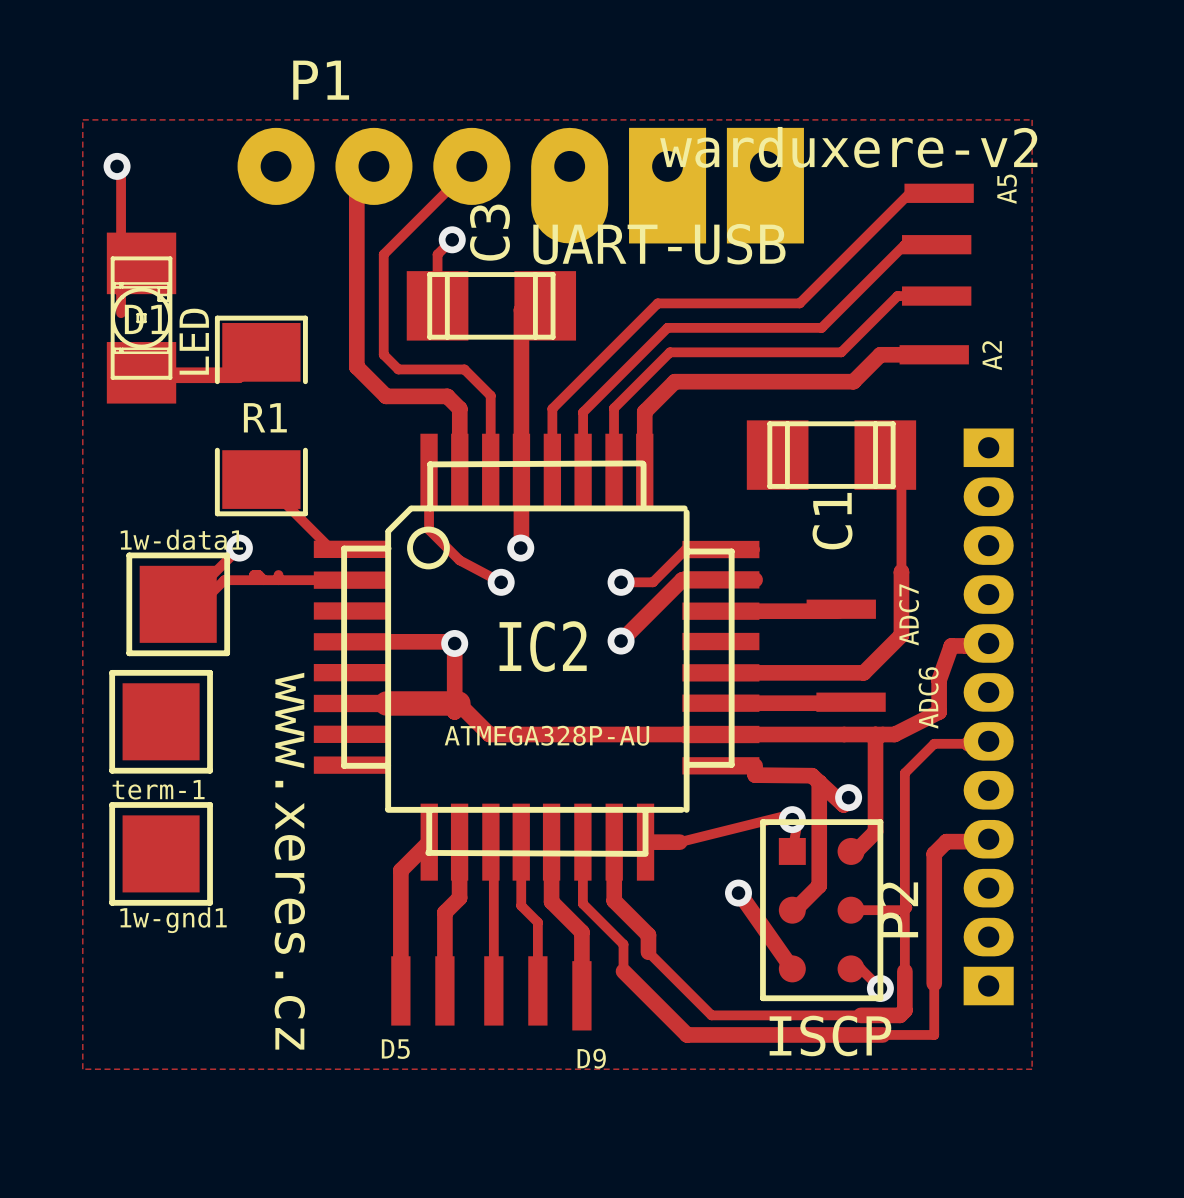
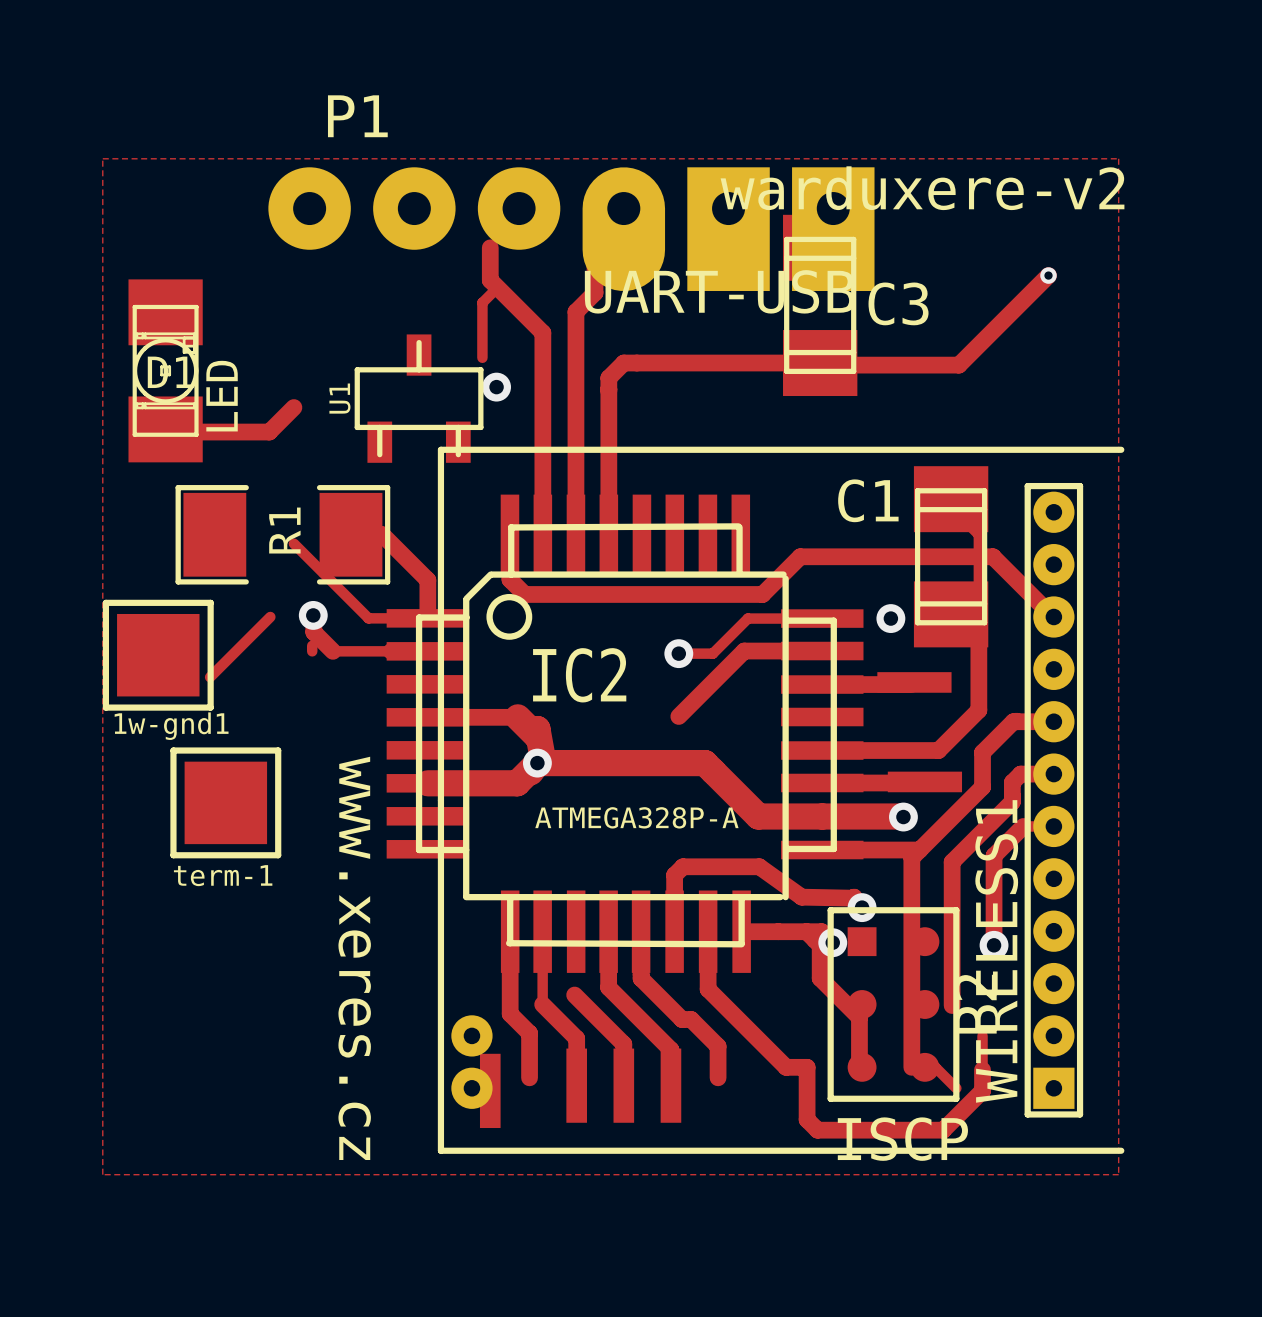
track: (117, 166) (121, 170) (121, 313) -> none
via: (117, 166) -> none
track: (373, 166) (356, 183) (356, 367) (386, 396) (447, 396) (459, 408) (459, 472) -> none
track: (471, 166) (383, 254) (383, 354) (398, 369) (464, 369) (490, 395) (490, 472) -> none
track: (939, 193) (909, 193) (799, 303) (657, 303) (552, 408) (552, 472) -> none
A5: (939, 193) -> none
track: none -> (490, 247) (490, 280) (542, 332) (542, 535)
track: none -> (595, 247) (595, 292) (575, 311) (575, 535)
track: none -> (1048, 275) (958, 365) (623, 363) (608, 377) (608, 535)
via: none -> (1048, 275)
via position: (452, 239) -> (496, 387)
track: (936, 244) (904, 244) (821, 327) (667, 327) (583, 412) (583, 472) -> none
part: (936, 244) -> none
track: (936, 296) (897, 296) (841, 352) (670, 352) (614, 408) (614, 472) -> none
part: (936, 296) -> none
C3 rotation: 0° (491, 305) -> 90° clockwise (820, 305)
C3 position: (491, 305) -> (820, 305)
track: (525, 305) (521, 310) (520, 548) -> none
U1: none -> (419, 398)
track: (934, 354) (880, 354) (853, 381) (674, 381) (644, 411) (644, 472) -> none
A2: (934, 354) -> none
R1 rotation: 0° (261, 415) -> 90° clockwise (282, 534)
C1 rotation: 0° (831, 455) -> 90° clockwise (951, 556)
track: none -> (350, 534) (382, 534) (427, 580) (427, 618)
track: (429, 472) (429, 529) (459, 560) (501, 582) -> none
track: none -> (509, 535) (509, 579) (524, 594) (762, 594) (800, 556) (992, 556) (1053, 616)
via position: (239, 548) -> (313, 615)
via: (520, 548) -> none
via: none -> (890, 618)
track: (254, 574) (258, 574) (263, 580) (254, 574) -> none
track: (297, 580) (224, 580) (200, 604) (178, 604) -> (332, 651) (313, 632) (313, 615)
via: (501, 582) -> none
1w-data1: (178, 604) -> none
ADC7 name: ADC7 (909, 614) -> none
track: (453, 641) (454, 643) (454, 712) -> (498, 717) (517, 717) (537, 736) (537, 729) (542, 757) (517, 783) (504, 783)
via: (621, 641) -> none
via: (454, 643) -> none
track: (951, 645) (939, 680) (939, 712) (894, 734) (830, 734) -> (1032, 721) (1013, 721) (982, 752) (982, 787) (911, 857) (911, 1067)
IC2 name position: IC2 (543, 646) -> IC2 (579, 675)
IC2 position: (536, 657) -> (625, 733)
via: none -> (537, 763)
track: none -> (1053, 774) (1020, 774) (1012, 782) (1012, 801) (952, 862) (952, 1005)
ADC6 name: ADC6 (928, 697) -> none
track: (458, 703) (489, 734) (695, 734) -> (530, 772) (537, 763) (704, 763) (758, 816)
part: (988, 716) -> none
WIRELESS1: none -> (781, 800)
term-1 position: (161, 721) -> (225, 802)
track width: thin (695, 734) (830, 734) -> thick (758, 816) (902, 816)
via: none -> (903, 817)
track: (875, 734) (875, 831) (855, 851) (851, 851) -> none
IC2 value: ATMEGA328P-AU (546, 735) -> ATMEGA328P-A (636, 817)
track: (943, 743) (934, 743) (904, 773) (904, 939) -> (1023, 826) (994, 855) (995, 944)
track: (755, 765) (755, 775) (812, 775) (843, 804) (848, 797) -> (822, 850) (919, 850)
track: (819, 782) (819, 885) (794, 910) (792, 910) -> none
via: (848, 797) -> none
track: none -> (854, 897) (801, 897) (759, 866) (682, 866) (674, 875) (674, 931)
track: (971, 841) (946, 841) (934, 853) (934, 1034) (687, 1034) (623, 971) (623, 944) (582, 903) (582, 842) -> none
track: (429, 842) (400, 870) (400, 990) -> none
track: (459, 842) (459, 897) (444, 912) (444, 990) -> none
track: none -> (510, 931) (510, 1013) (529, 1033) (529, 1077)
track: (521, 842) (521, 905) (537, 922) (537, 990) -> none
track: (551, 842) (551, 901) (581, 932) (581, 995) -> none
track: none -> (608, 931) (608, 987) (670, 1049) (670, 1077)
track: none -> (641, 931) (641, 978) (682, 1019) (691, 1019) (718, 1046) (718, 1077)
track: (614, 842) (614, 900) (648, 935) (648, 952) (711, 1015) (899, 1015) (904, 1010) (904, 990) -> (708, 931) (708, 989) (786, 1067) (807, 1067) (807, 1119) (817, 1130) (943, 1130) (982, 1090)
track: (645, 842) (679, 842) (787, 815) (797, 824) (792, 851) -> none
track: none -> (741, 931) (821, 931) (832, 942)
track: none -> (806, 931) (820, 945) (820, 978) (859, 1017) (859, 1067)
1w-gnd1 position: (161, 853) -> (158, 655)
via: none -> (994, 945)
text position: www.xeres.cz (289, 861) -> www.xeres.cz (354, 958)
track: (738, 893) (792, 968) -> none
via position: (738, 893) -> (832, 942)
track: none -> (574, 995) (623, 1044) (623, 1077)
track: (904, 907) (907, 907) (904, 910) (851, 910) -> none
track: (493, 910) (493, 990) -> (542, 1004) (576, 1038) (576, 1077)
via: (880, 988) -> none
D5: (400, 990) -> none
part position: (493, 990) -> (670, 1085)
part position: (537, 990) -> (576, 1085)
D9 position: (581, 995) -> (623, 1085)
D9 name: D9 (591, 1058) -> none

